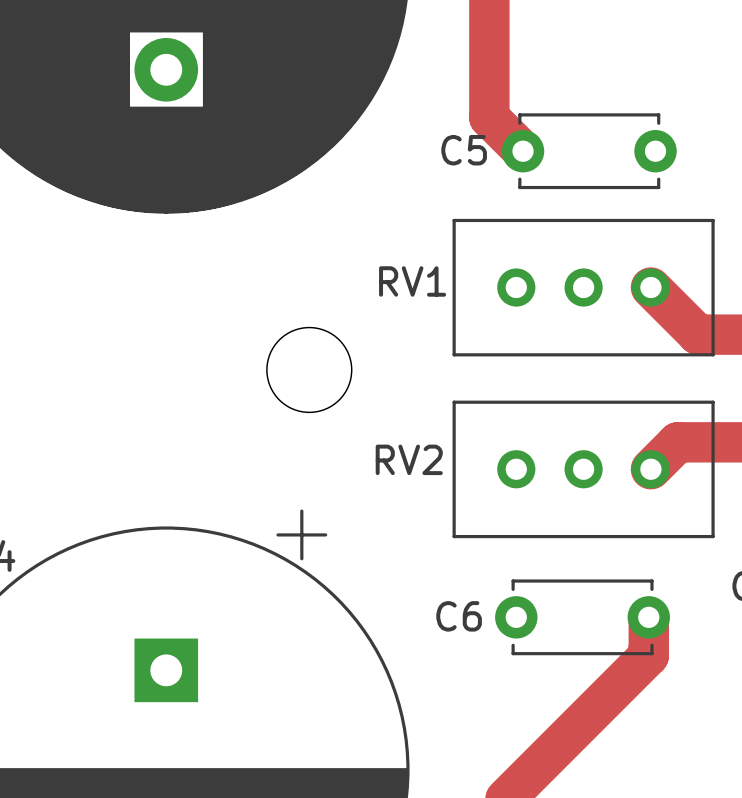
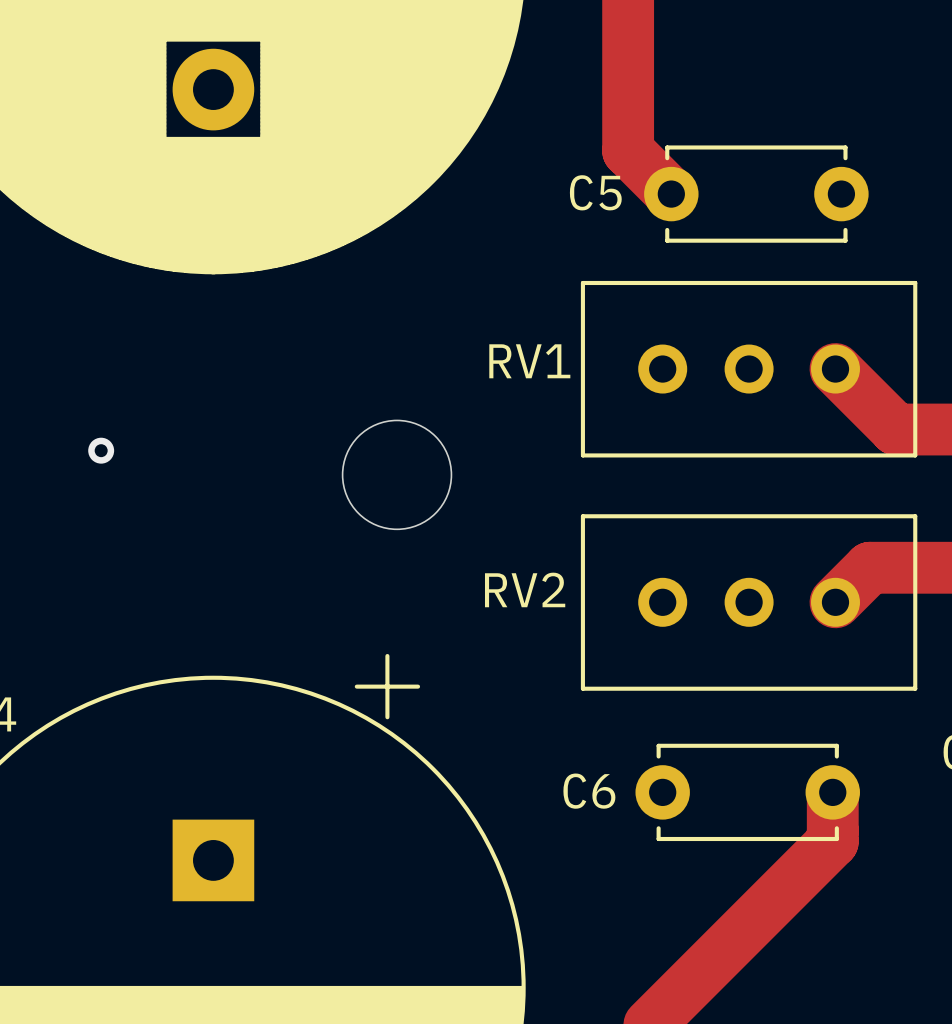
via: none -> (101, 450)

